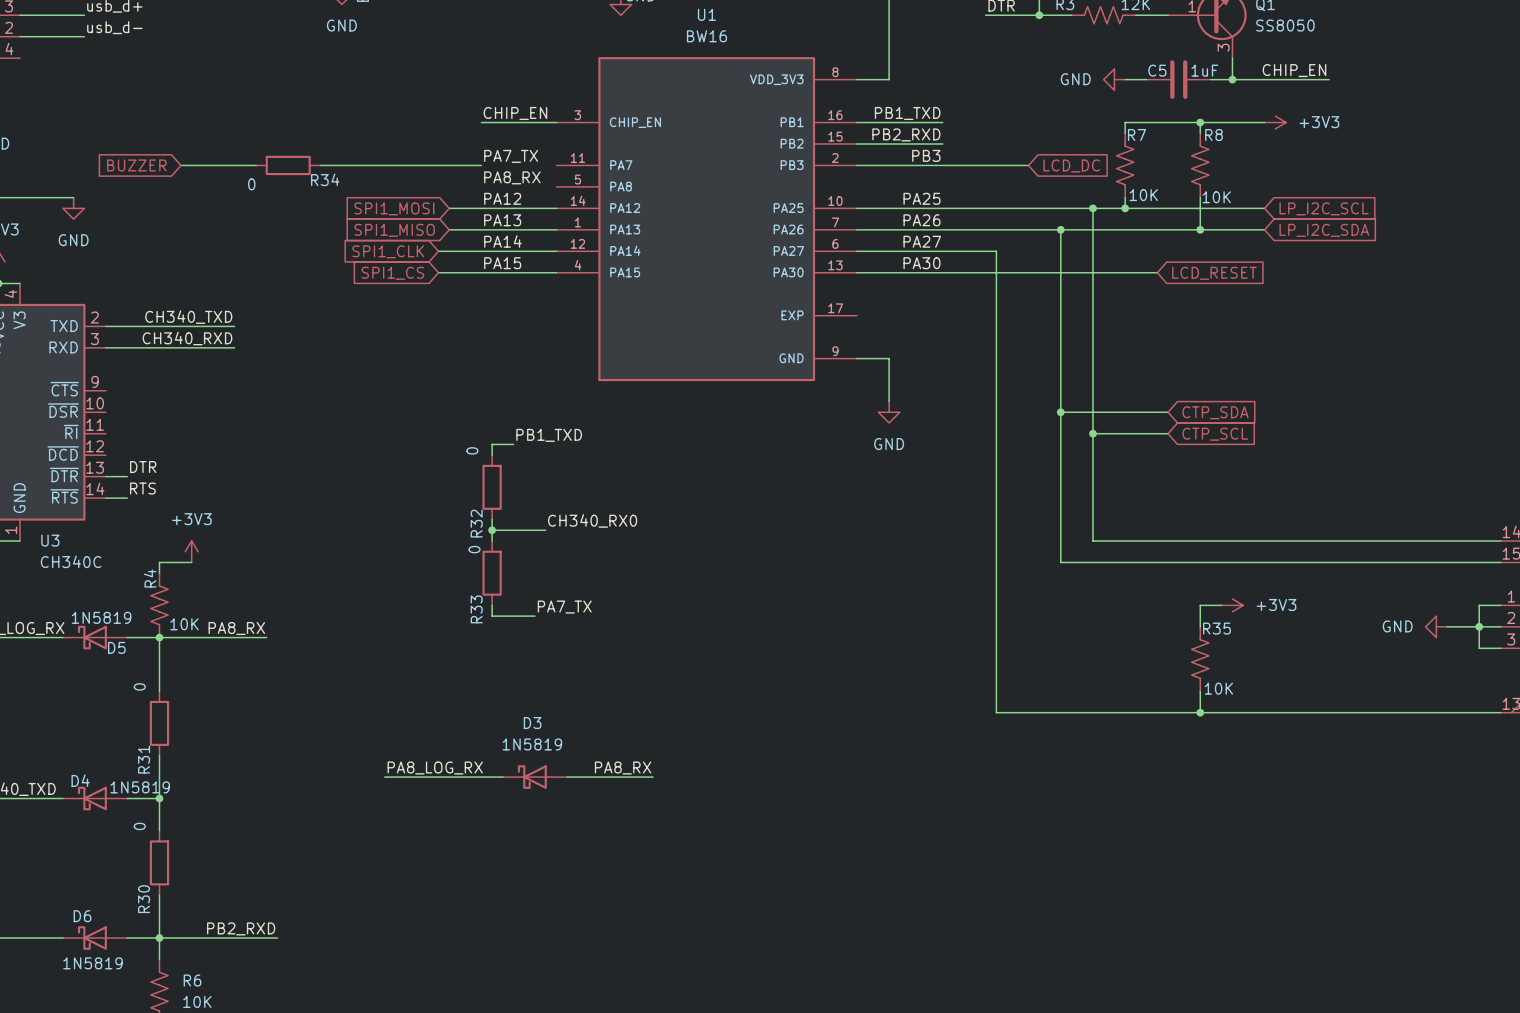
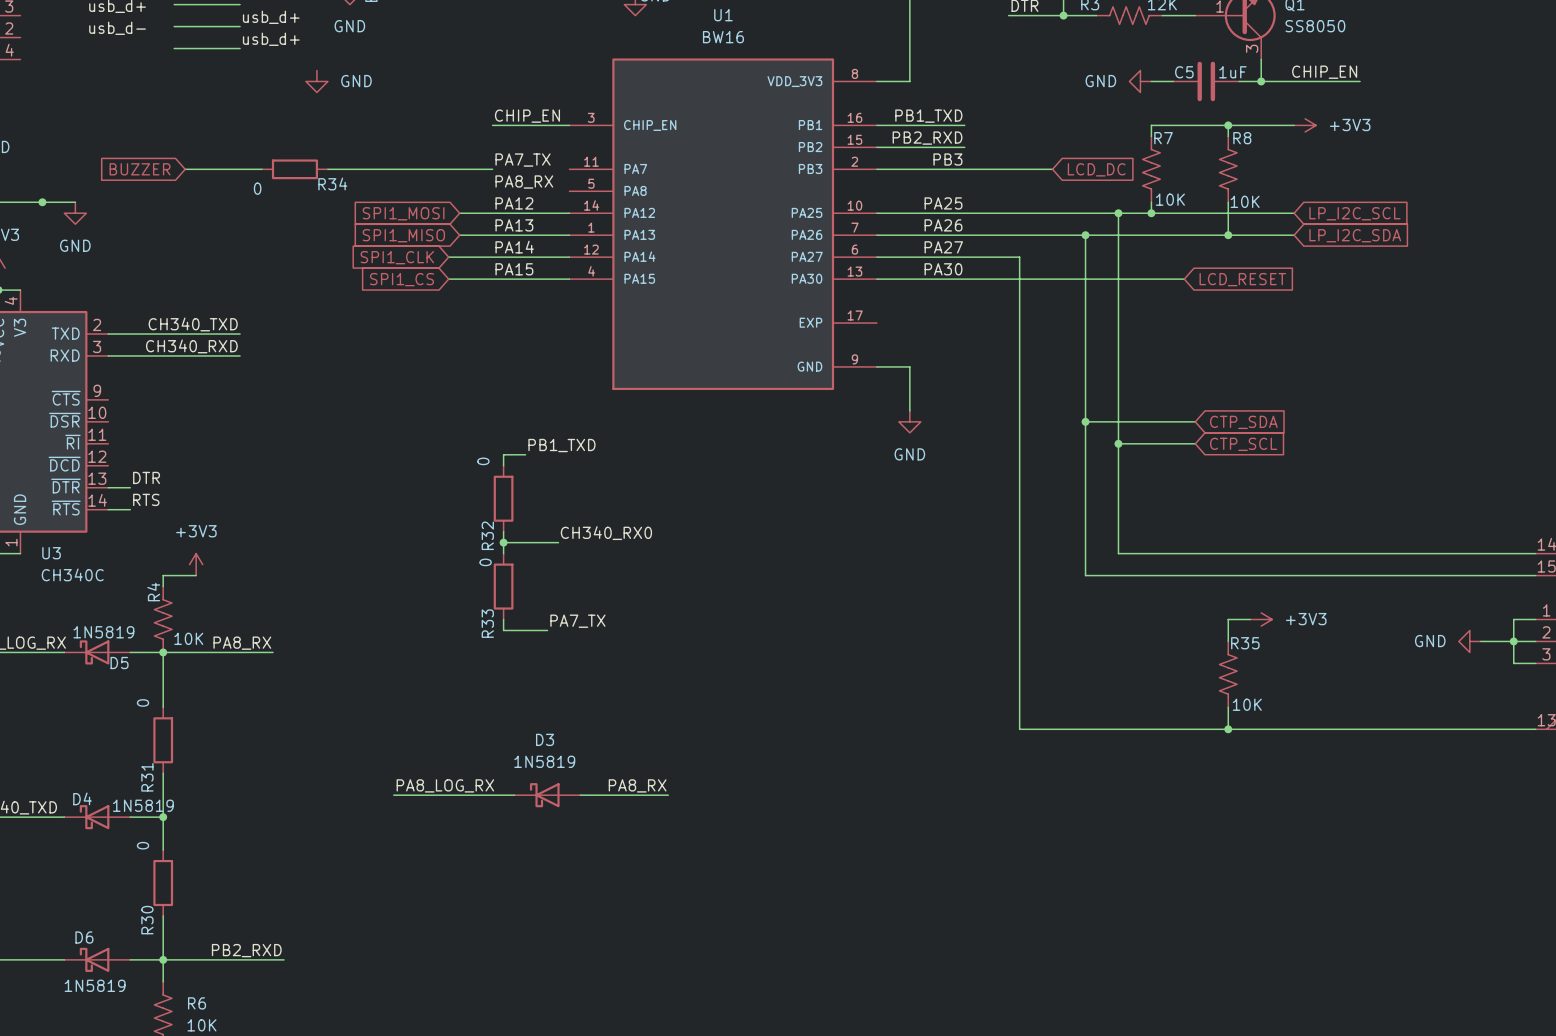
wire: (19, 15) (84, 15) -> (174, 4) (240, 4)
label: none -> usb_d+ (271, 17)
wire: (19, 36) (84, 36) -> (174, 26) (240, 26)
label: none -> usb_d+ (271, 39)
wire: none -> (174, 48) (240, 48)
power symbol: none -> GND (316, 81)
junction: none -> (42, 202)

